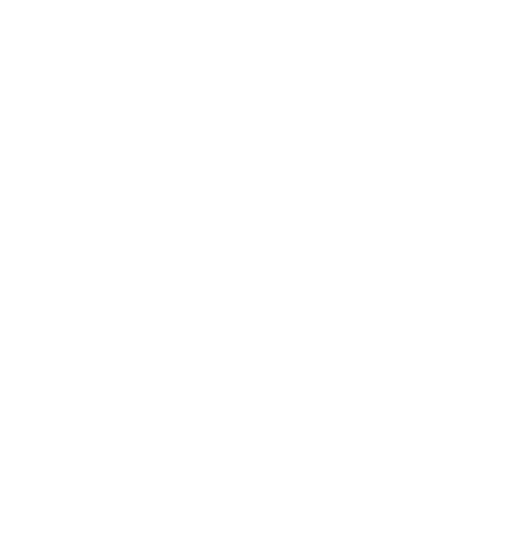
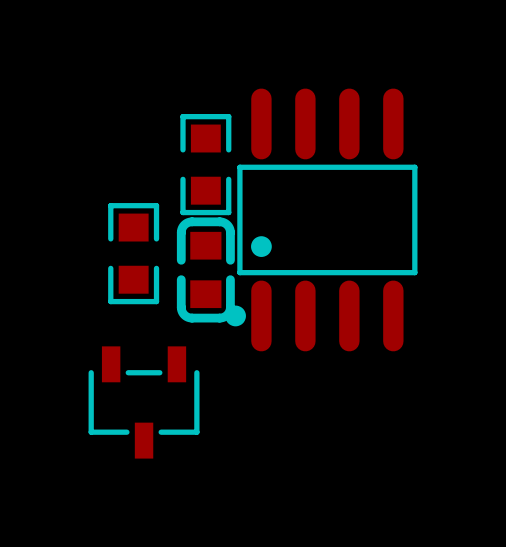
part: none -> (205, 164)
part: none -> (321, 219)
part: none -> (133, 253)
part: none -> (205, 269)
part: none -> (144, 402)

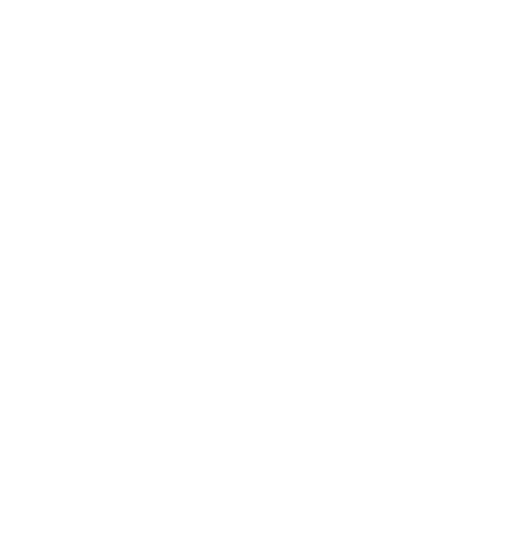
part: (205, 164) -> none
part: (321, 219) -> none
part: (133, 253) -> none
part: (205, 269) -> none
part: (144, 402) -> none

